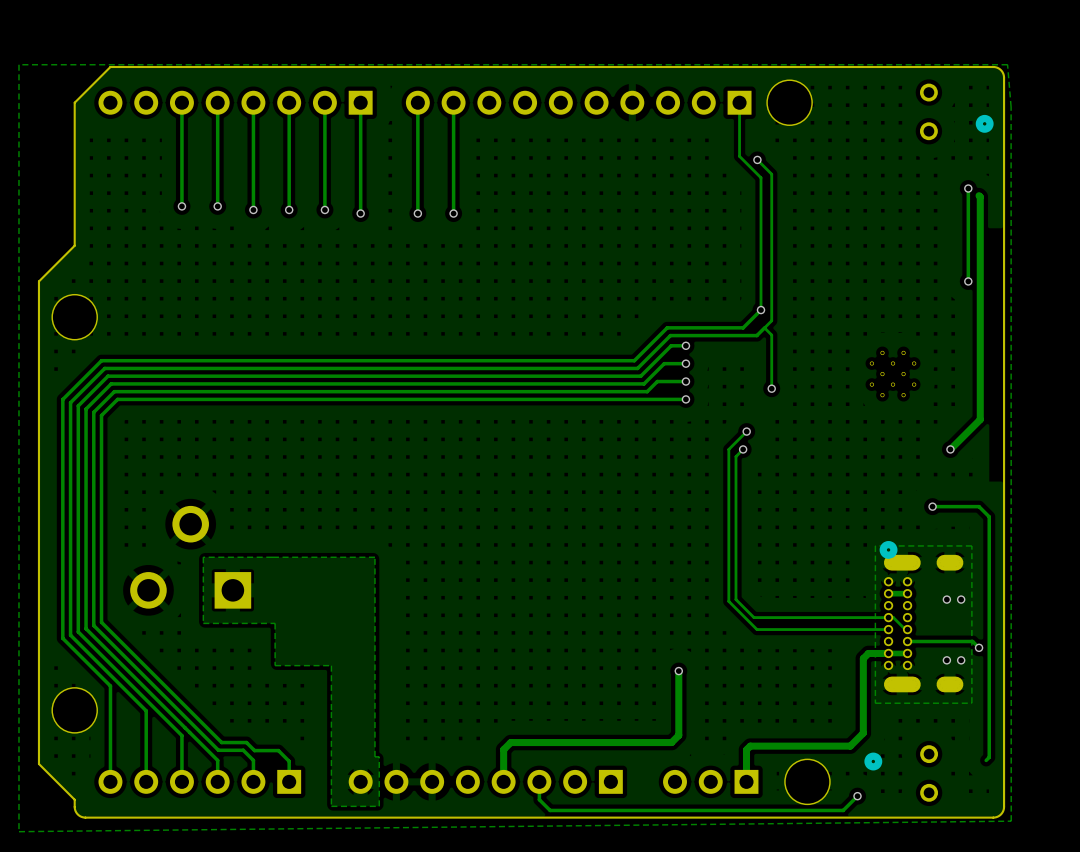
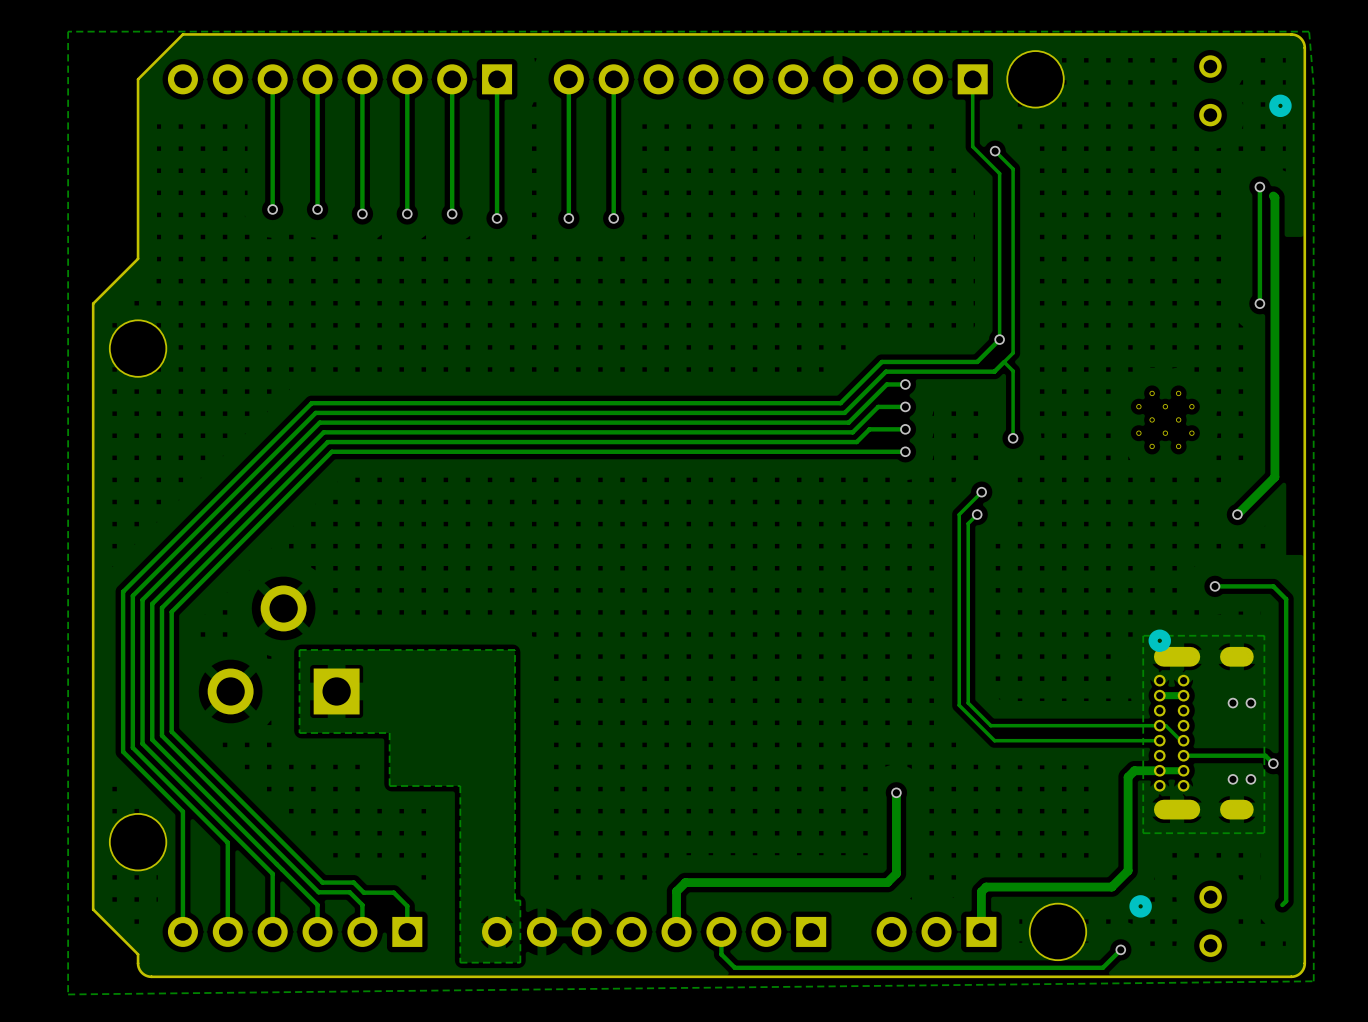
track: (213, 360) (101, 360) (62, 399) (62, 510) -> (311, 403) (123, 591)
track: (216, 368) (104, 368) (70, 402) (70, 514) -> (315, 412) (132, 595)
track: (219, 376) (107, 376) (78, 405) (78, 517) -> (319, 422) (142, 599)
track: (222, 383) (111, 383) (86, 409) (86, 520) -> (323, 432) (152, 603)
track: (225, 391) (114, 391) (93, 412) (93, 523) -> (327, 442) (161, 607)
track: (229, 399) (117, 399) (101, 415) (101, 526) -> (331, 451) (171, 611)

